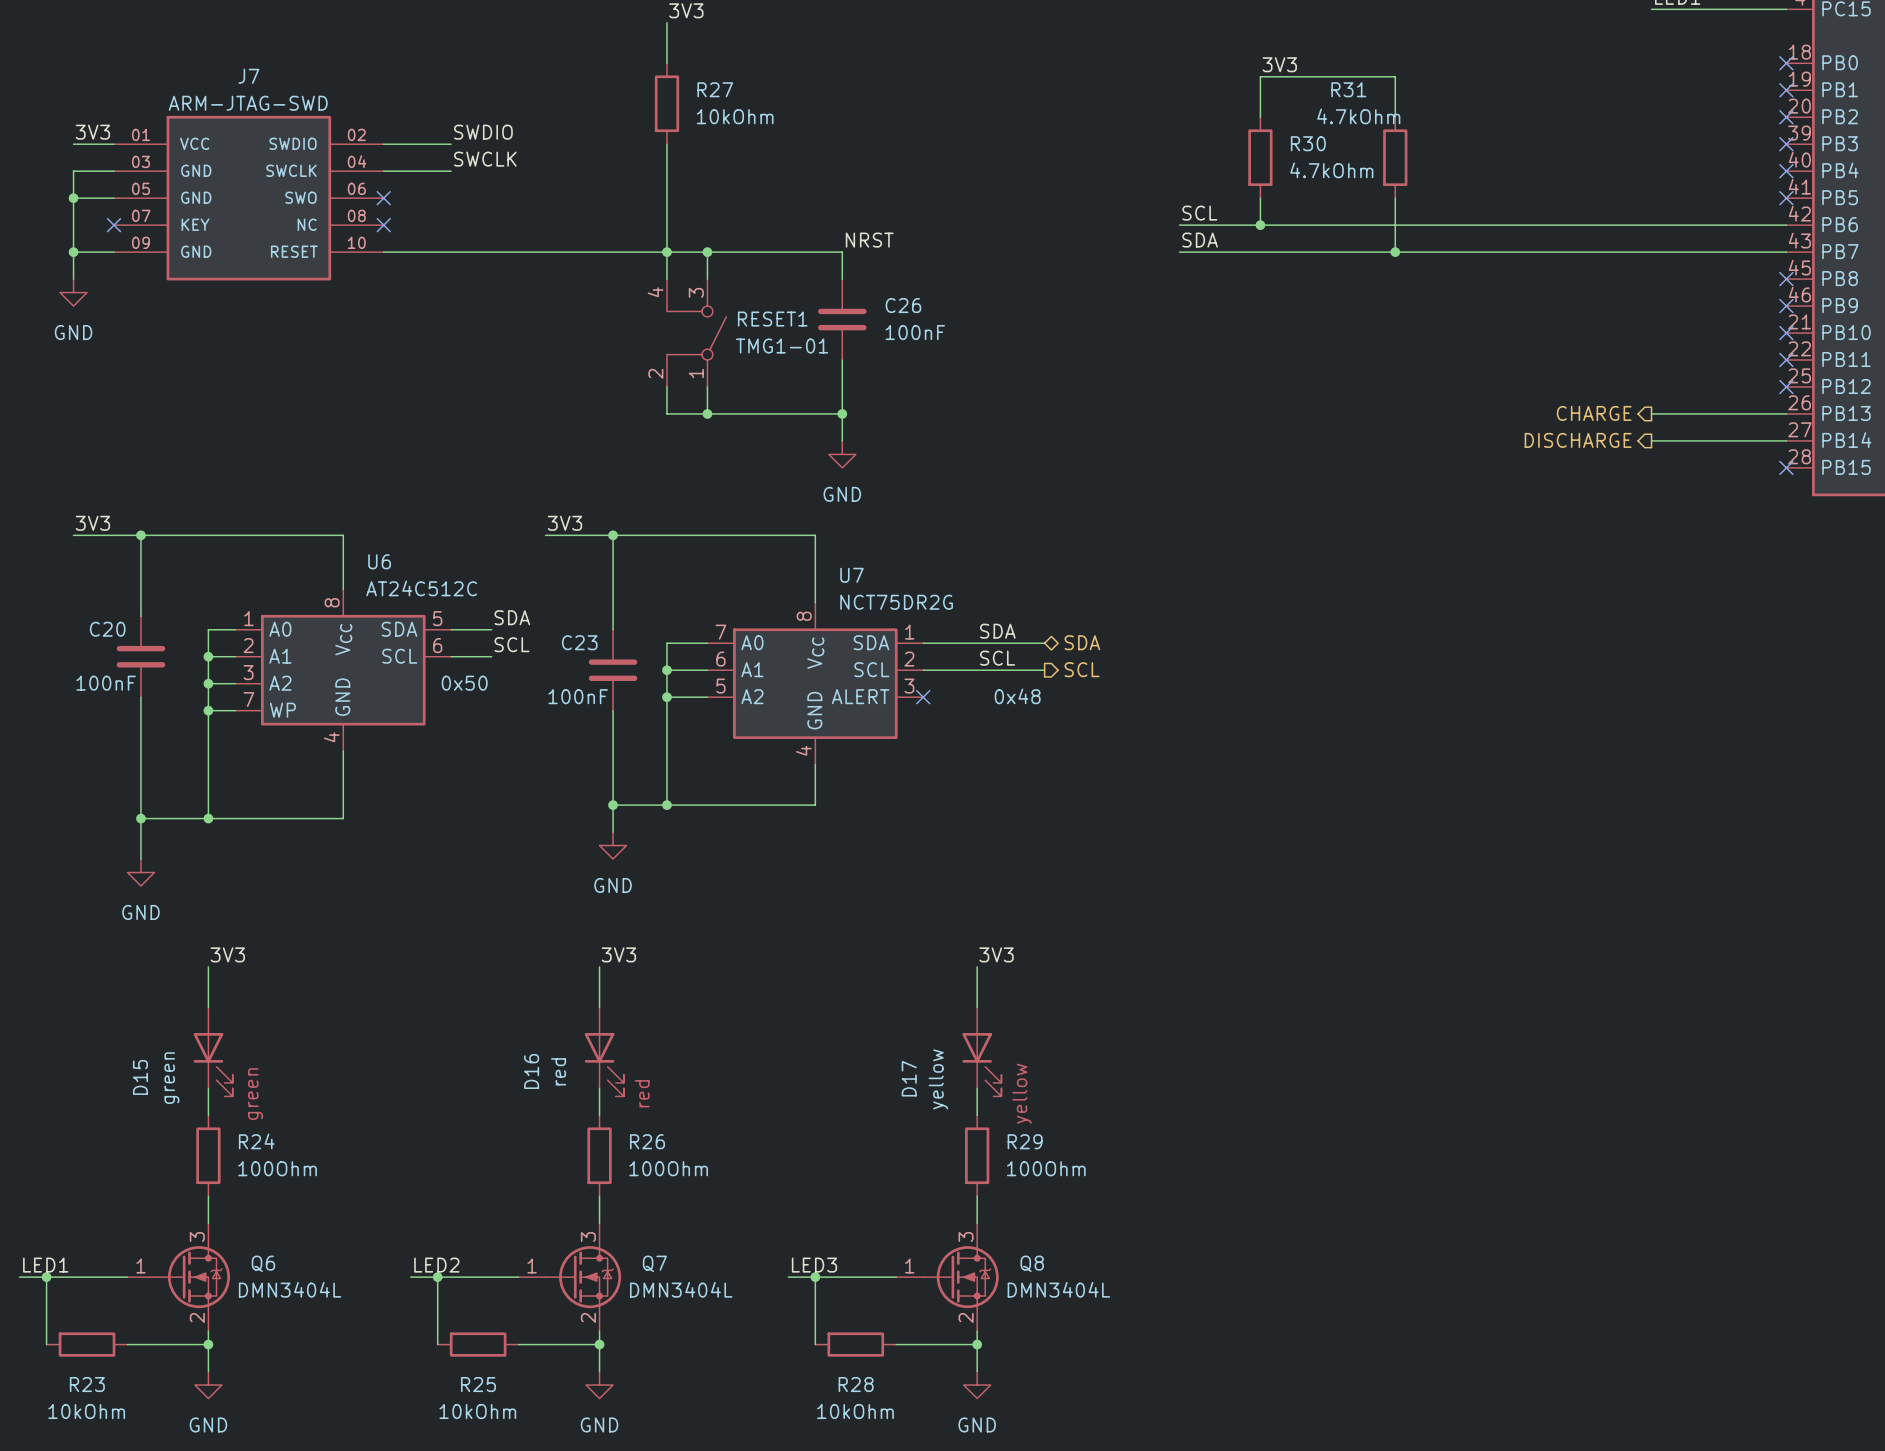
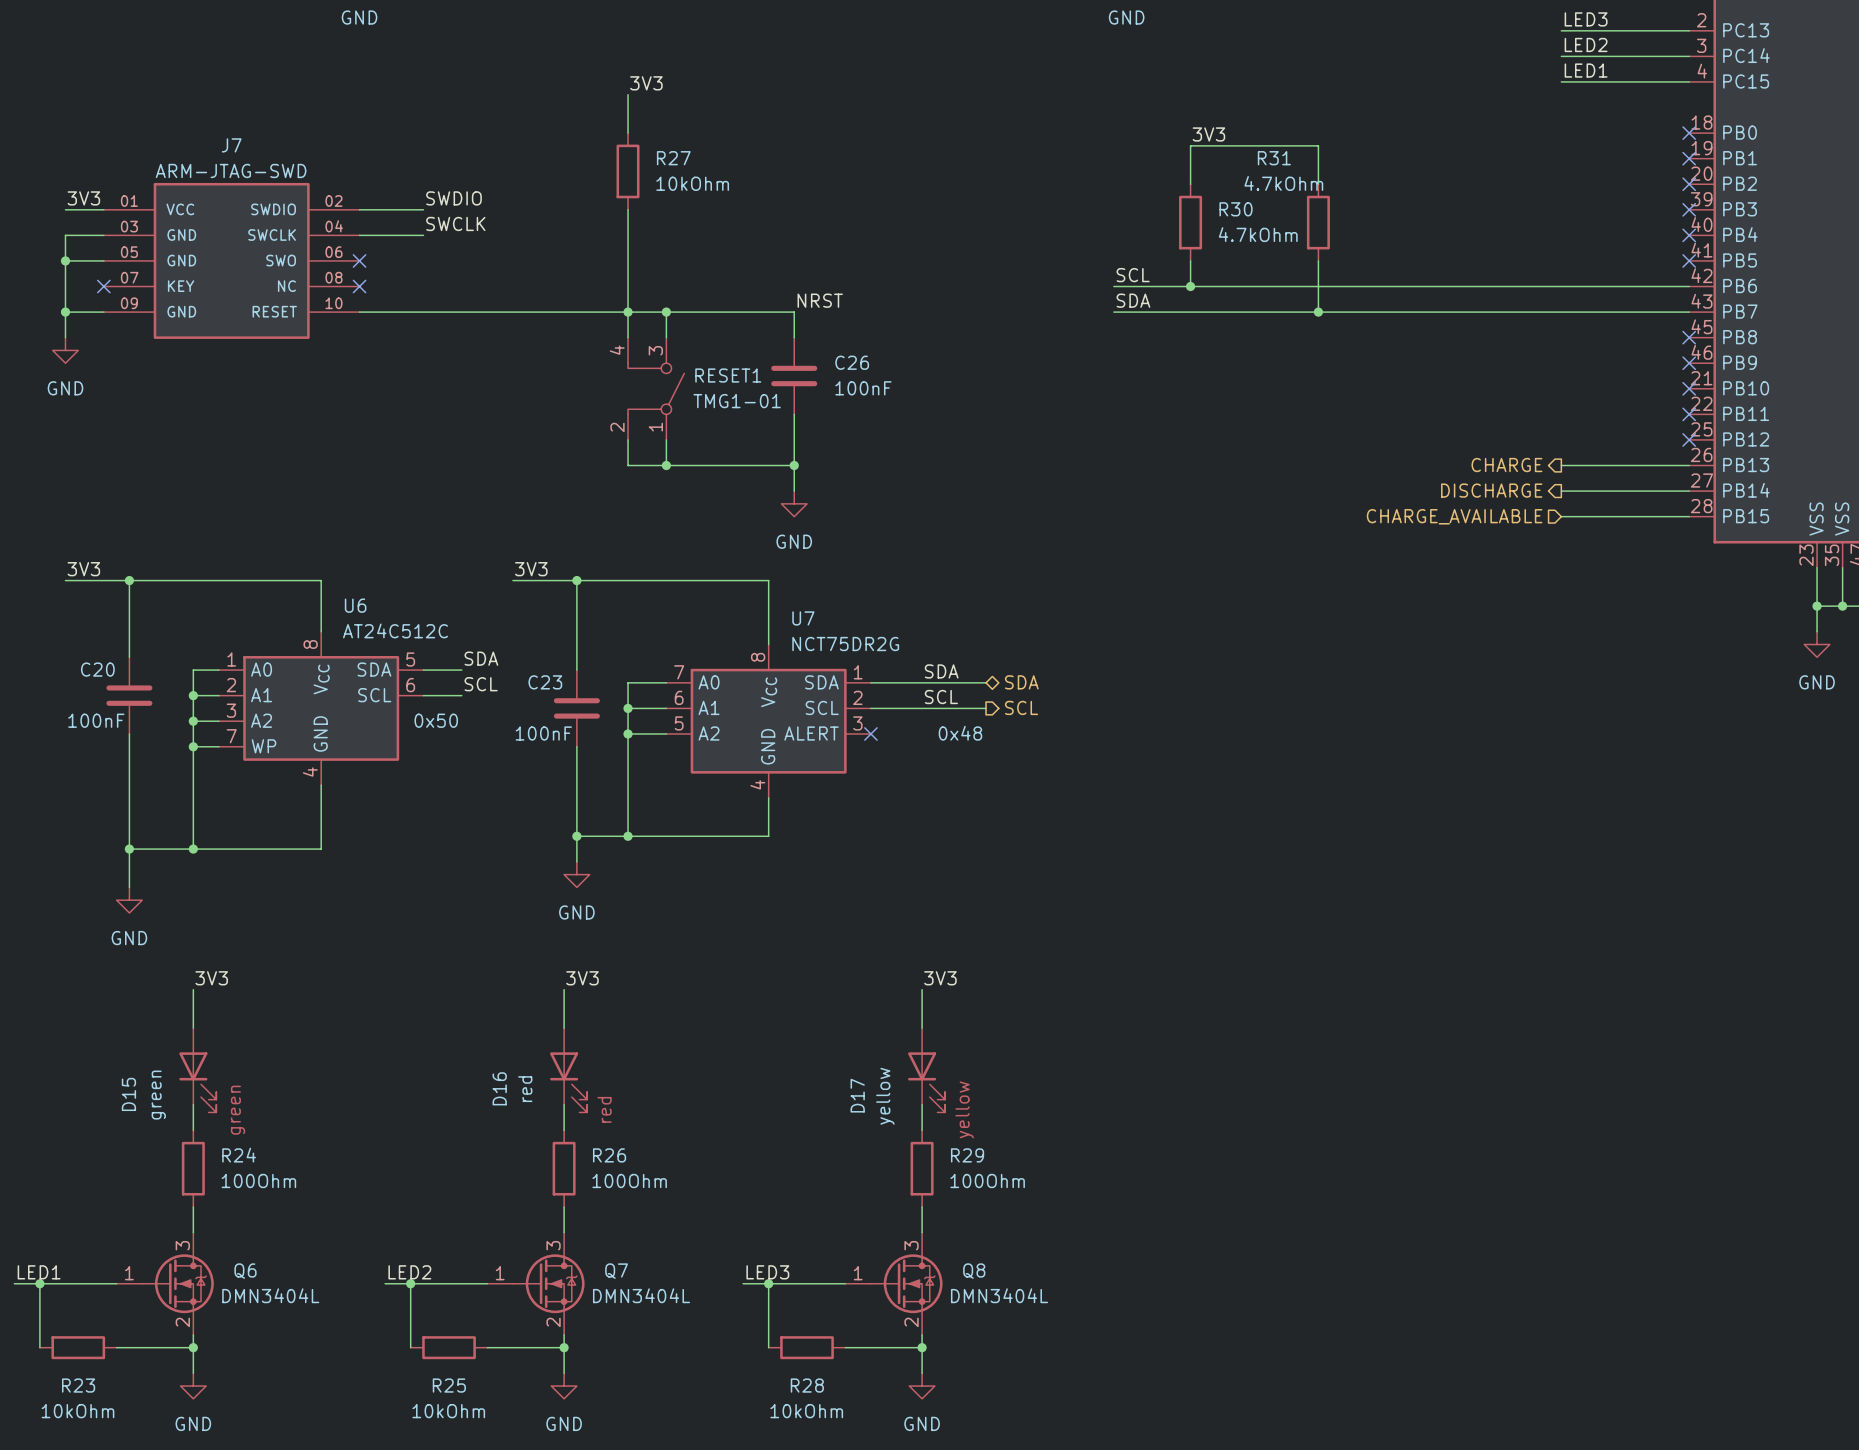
wire: none -> (1561, 516) (1689, 516)
no-connect mark: (1786, 467) -> none
hierarchical label: none -> CHARGE_AVAILABLE (1454, 516)

